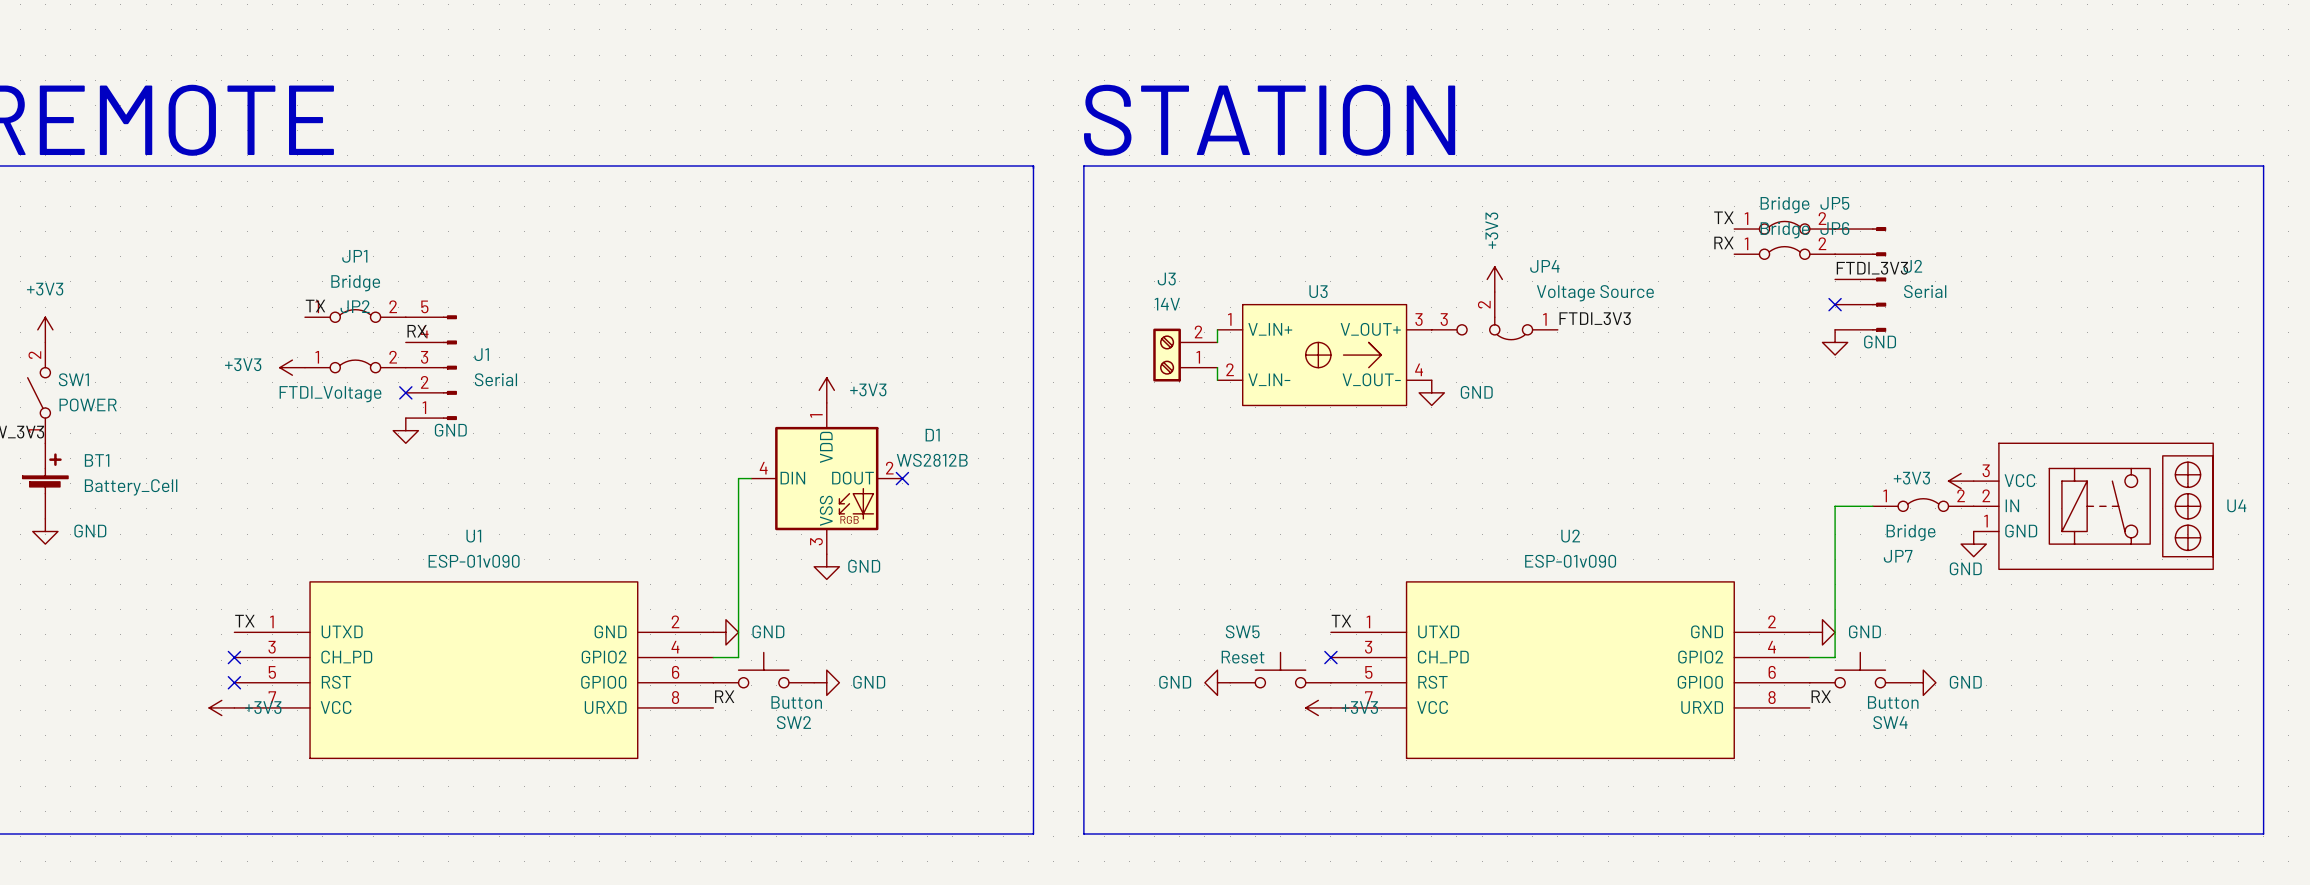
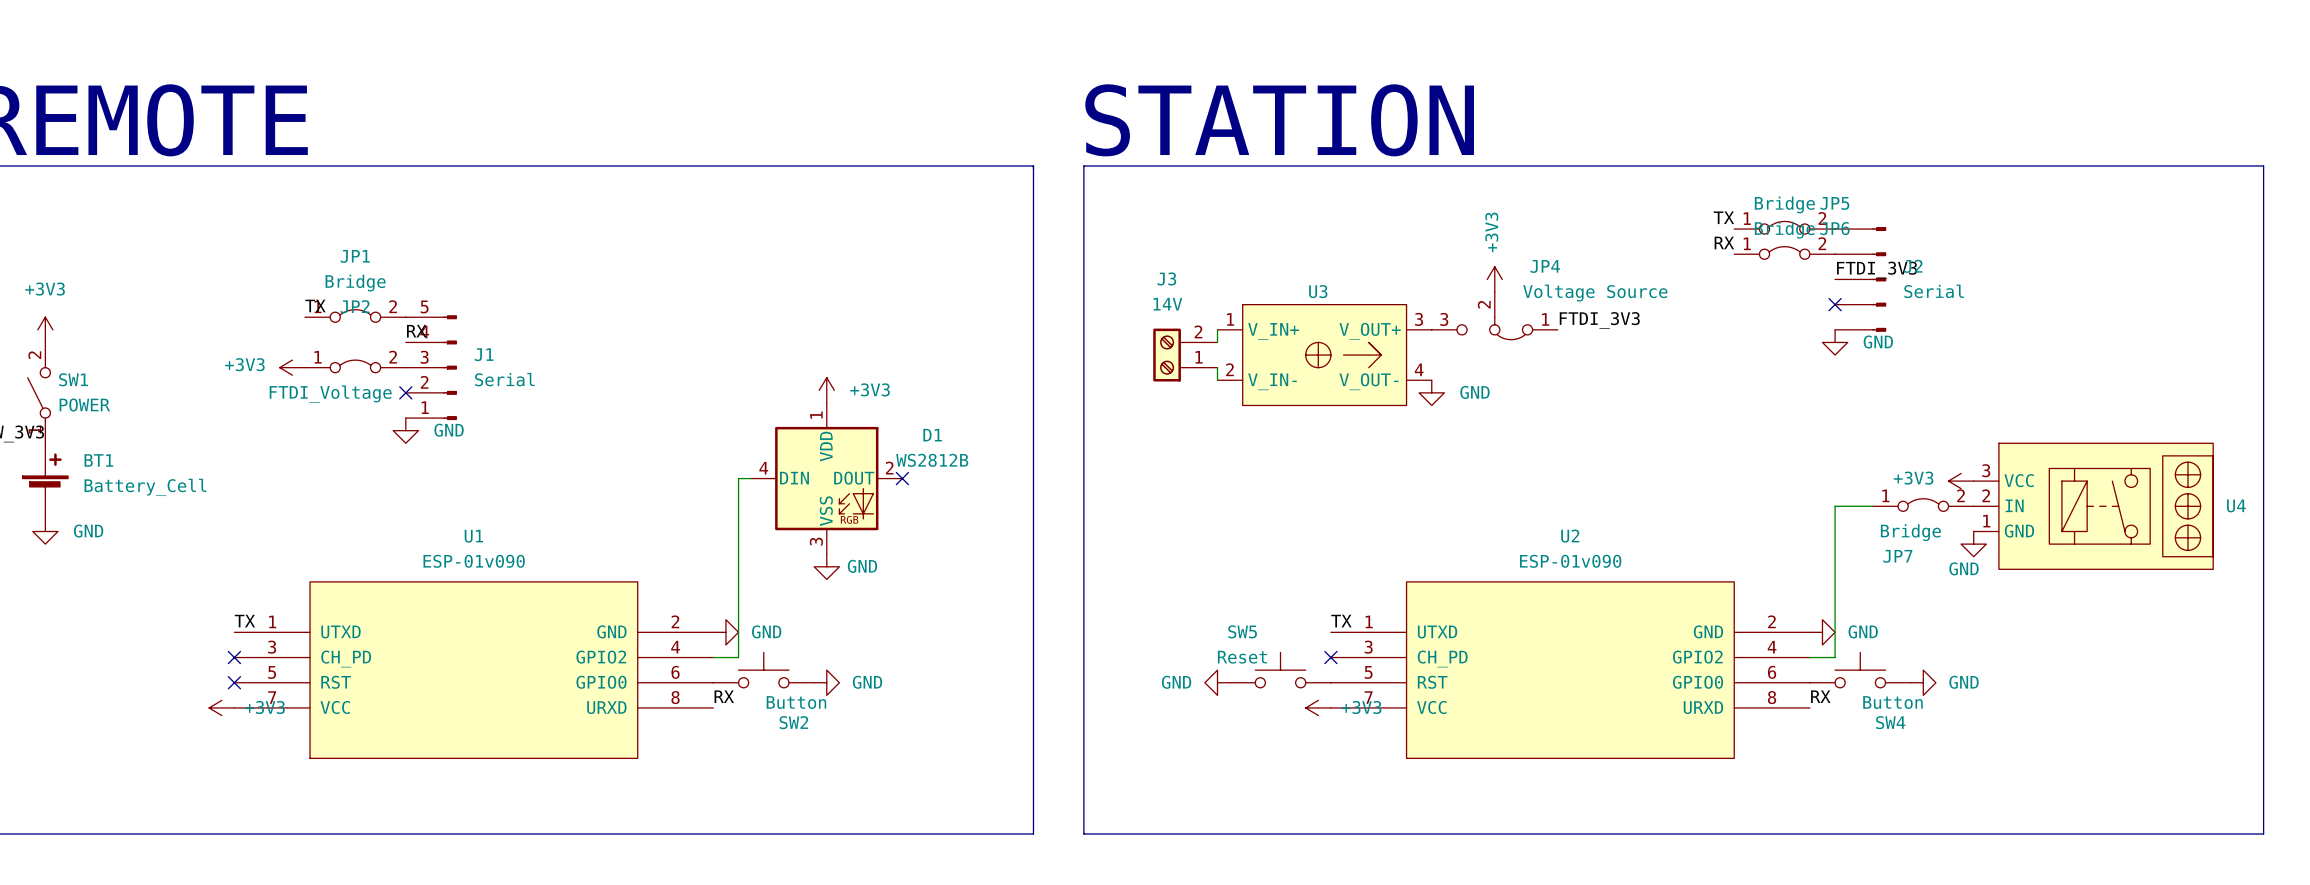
U4 symbol: [1973, 443, 2214, 570] -> [1973, 443, 2214, 570]

